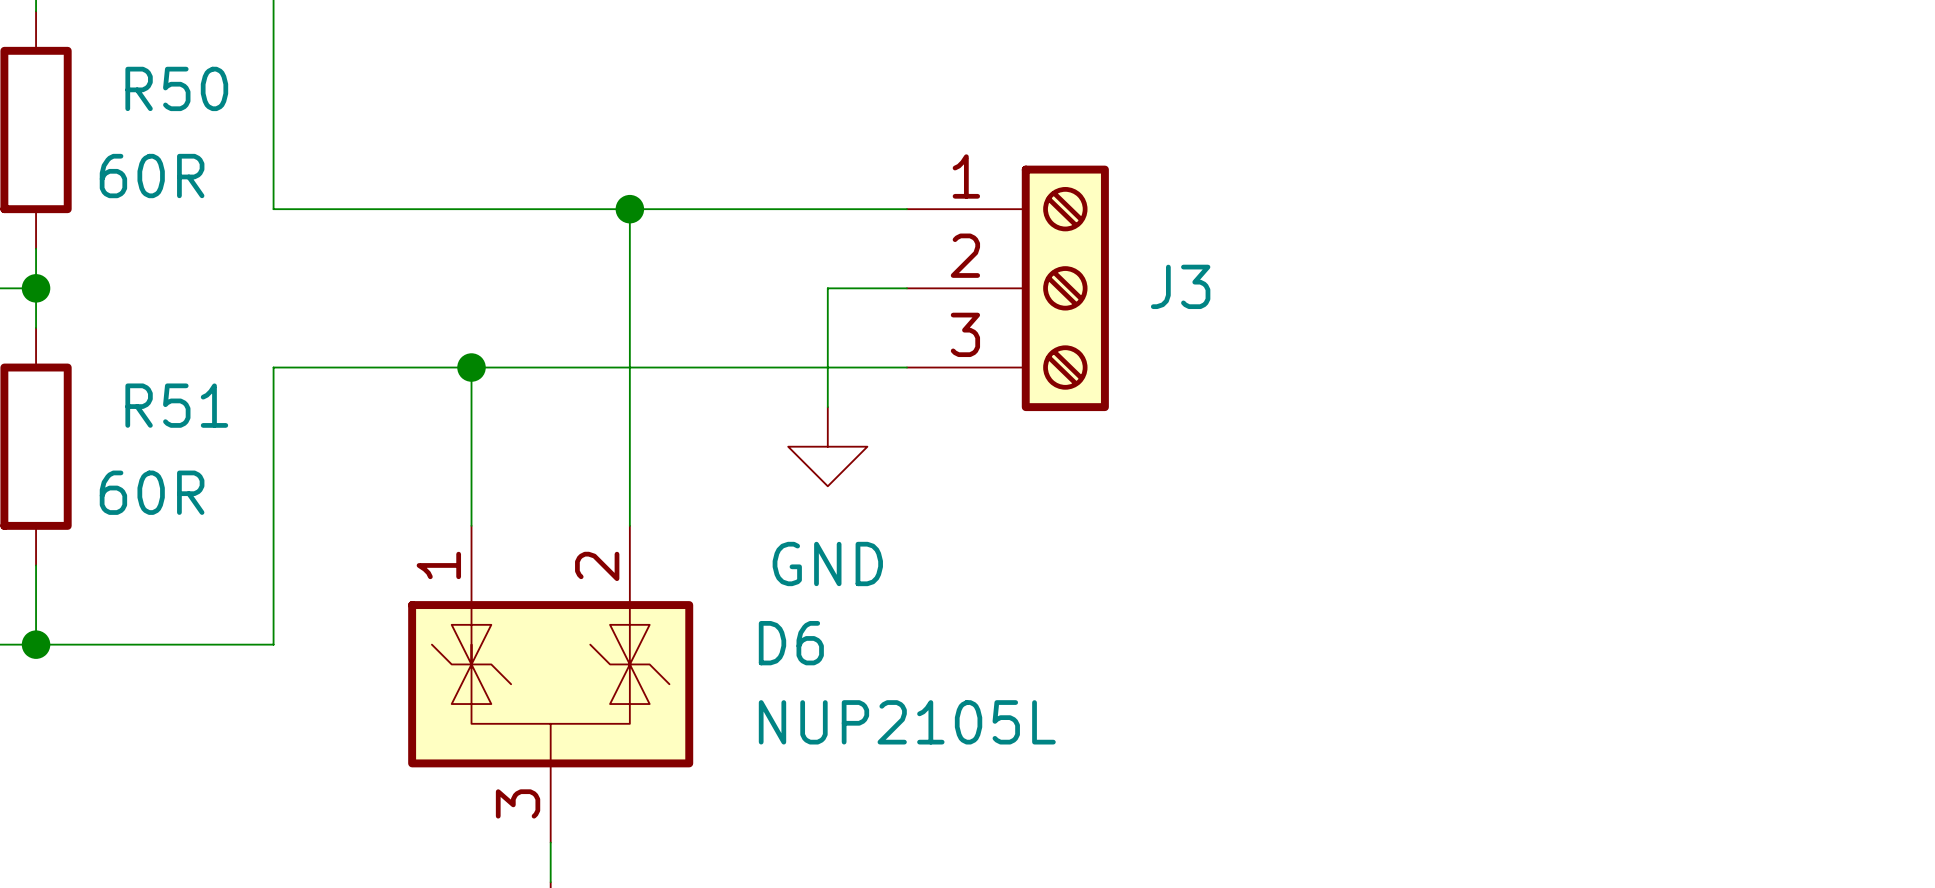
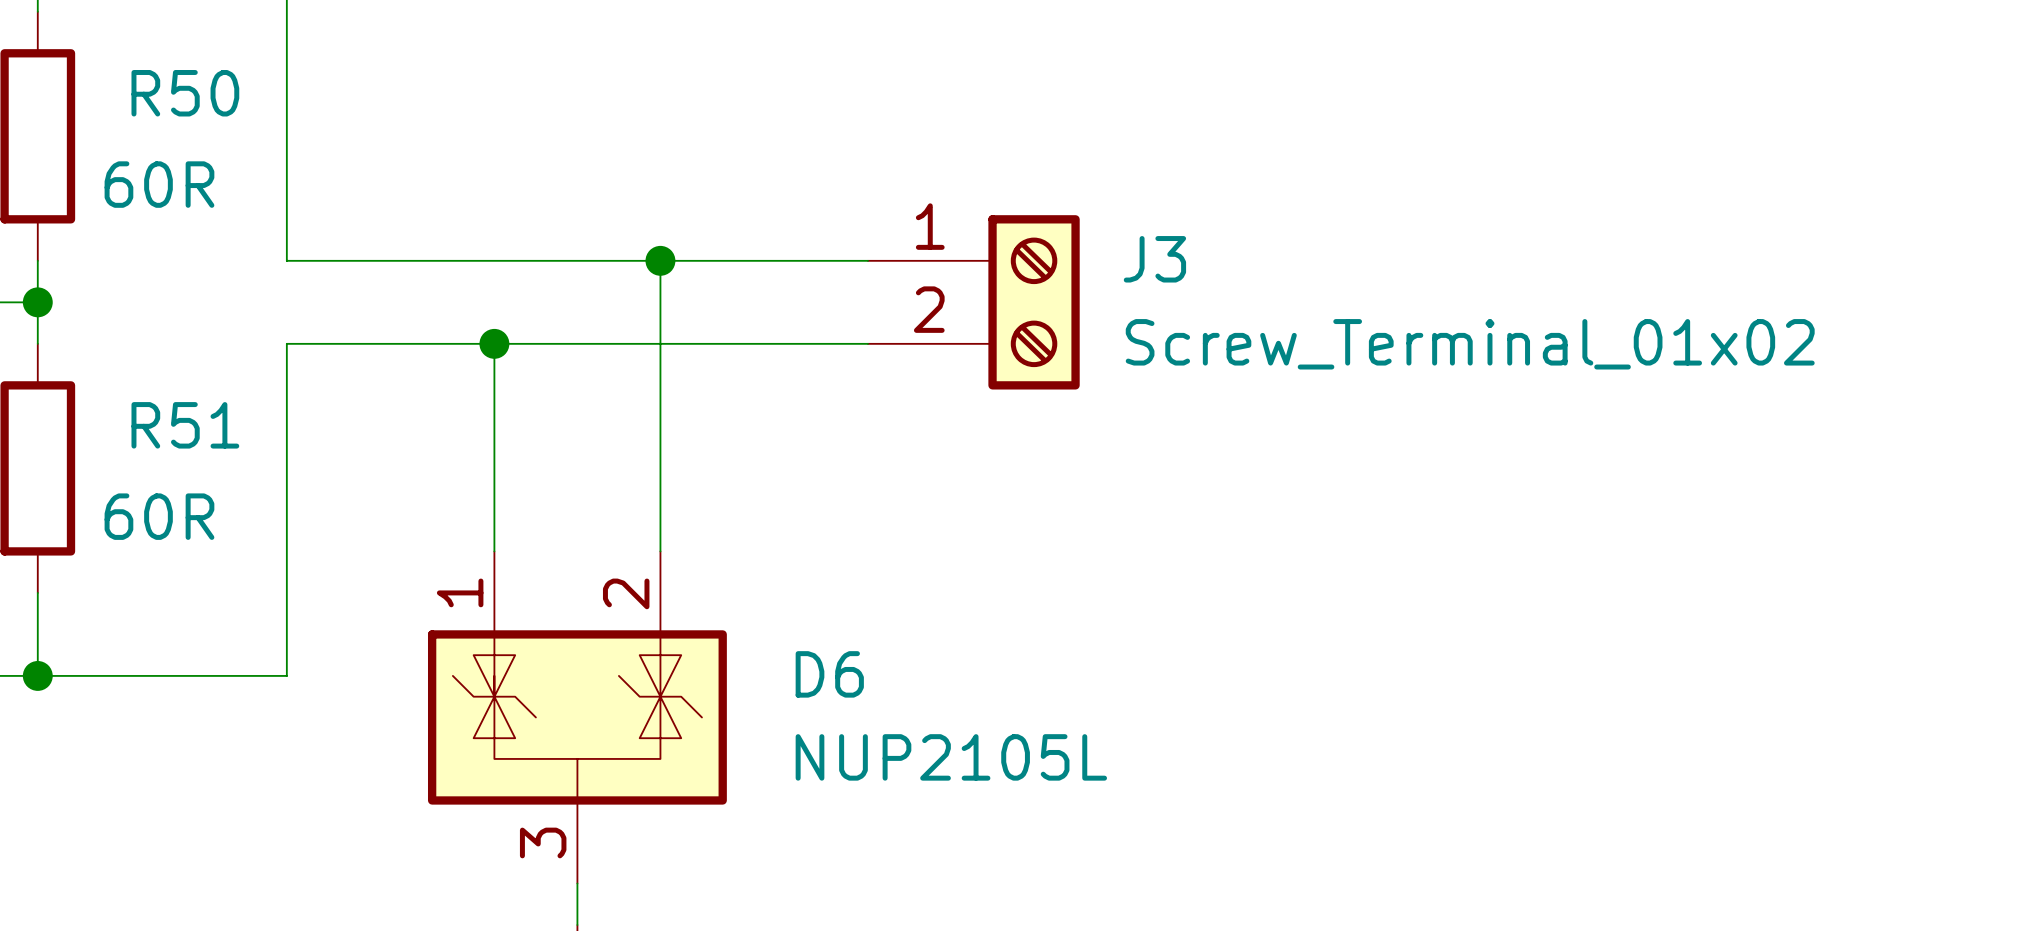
J3 symbol: [906, 165, 1109, 412] -> [868, 215, 1080, 390]
wire: (273, 209) (906, 209) -> (286, 219) (286, 260) (868, 260)
wire: (629, 209) (629, 248) -> (494, 343) (494, 385)
junction position: (629, 209) -> (660, 260)
wire: (906, 288) (827, 288) (827, 407) -> none
J3 value: none -> Screw_Terminal_01x02 (1470, 344)
wire: (273, 367) (906, 367) -> (286, 385) (286, 343) (868, 343)
junction position: (471, 367) -> (494, 343)
power symbol: GND (827, 446) -> none

